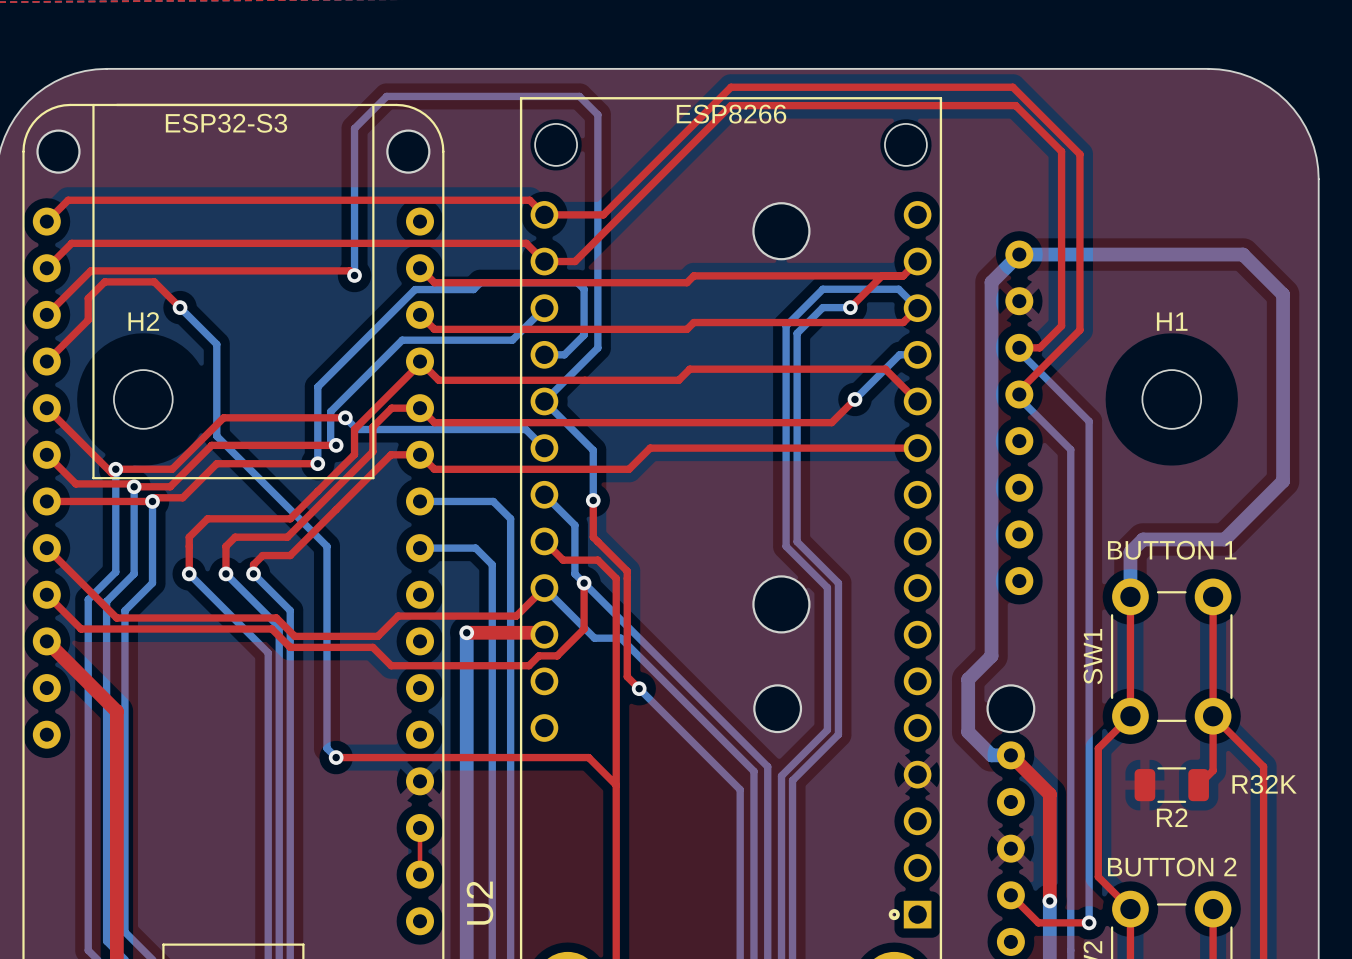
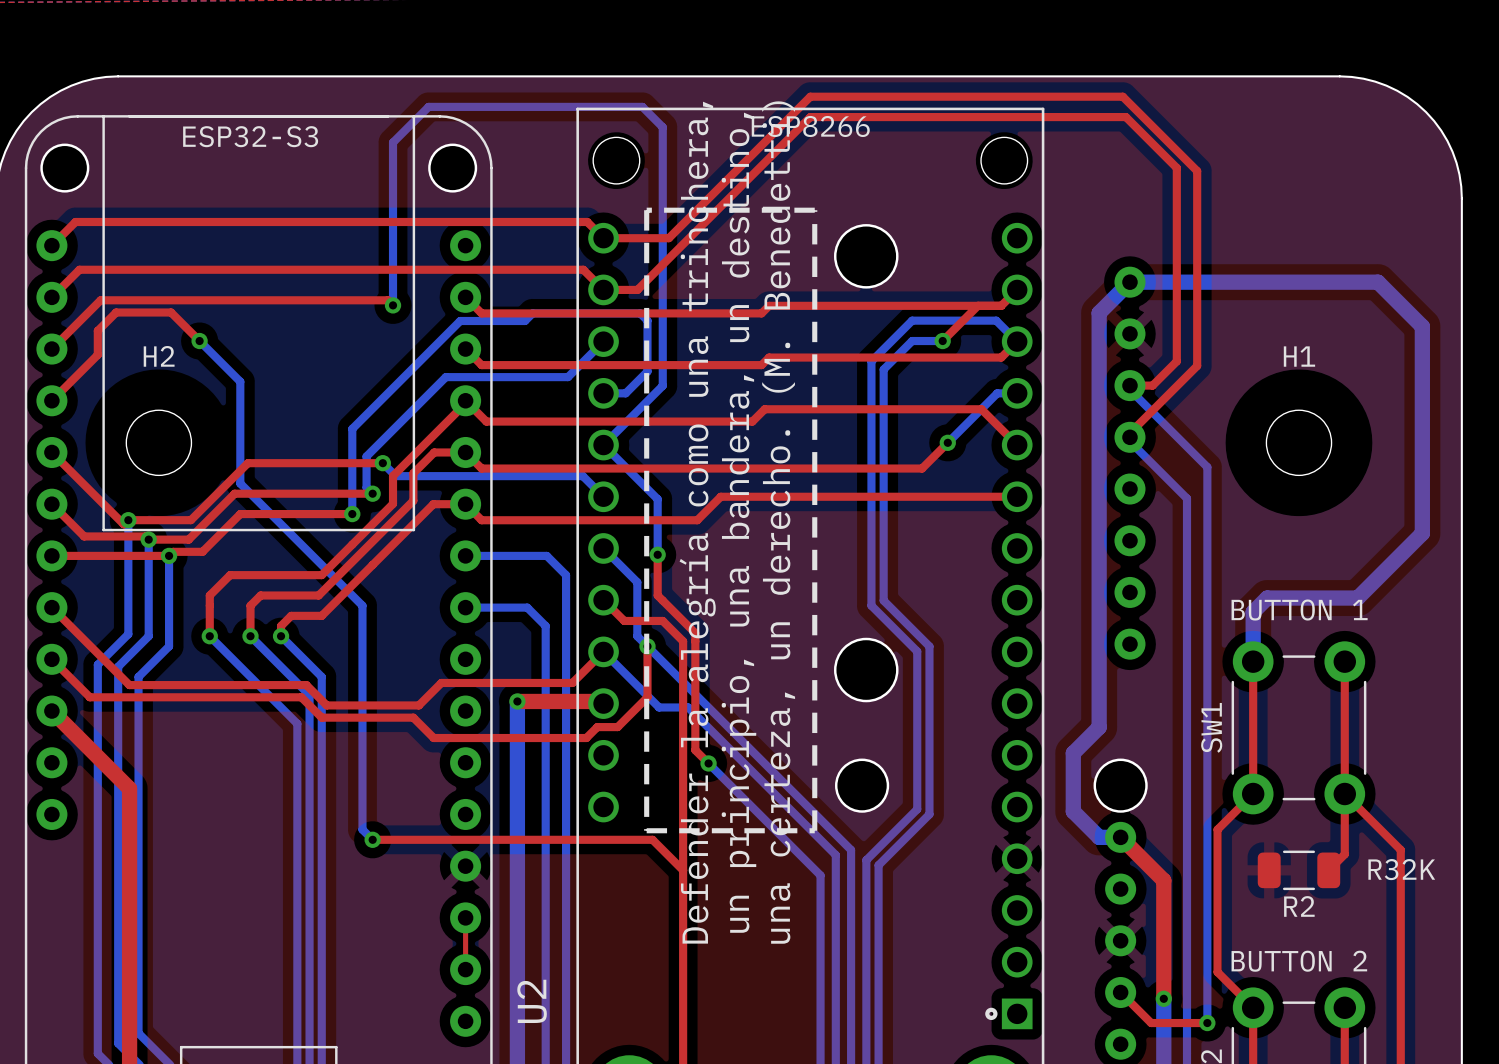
line: none -> (646, 210) (814, 210) (814, 830) (646, 830) (646, 210)
text: none -> Defender la alegría como una trinchera, (697, 522)
text: none -> un principio, una bandera, un destino, (738, 522)
text: none -> una certeza, un derecho. (M. Benedetti) (778, 522)

